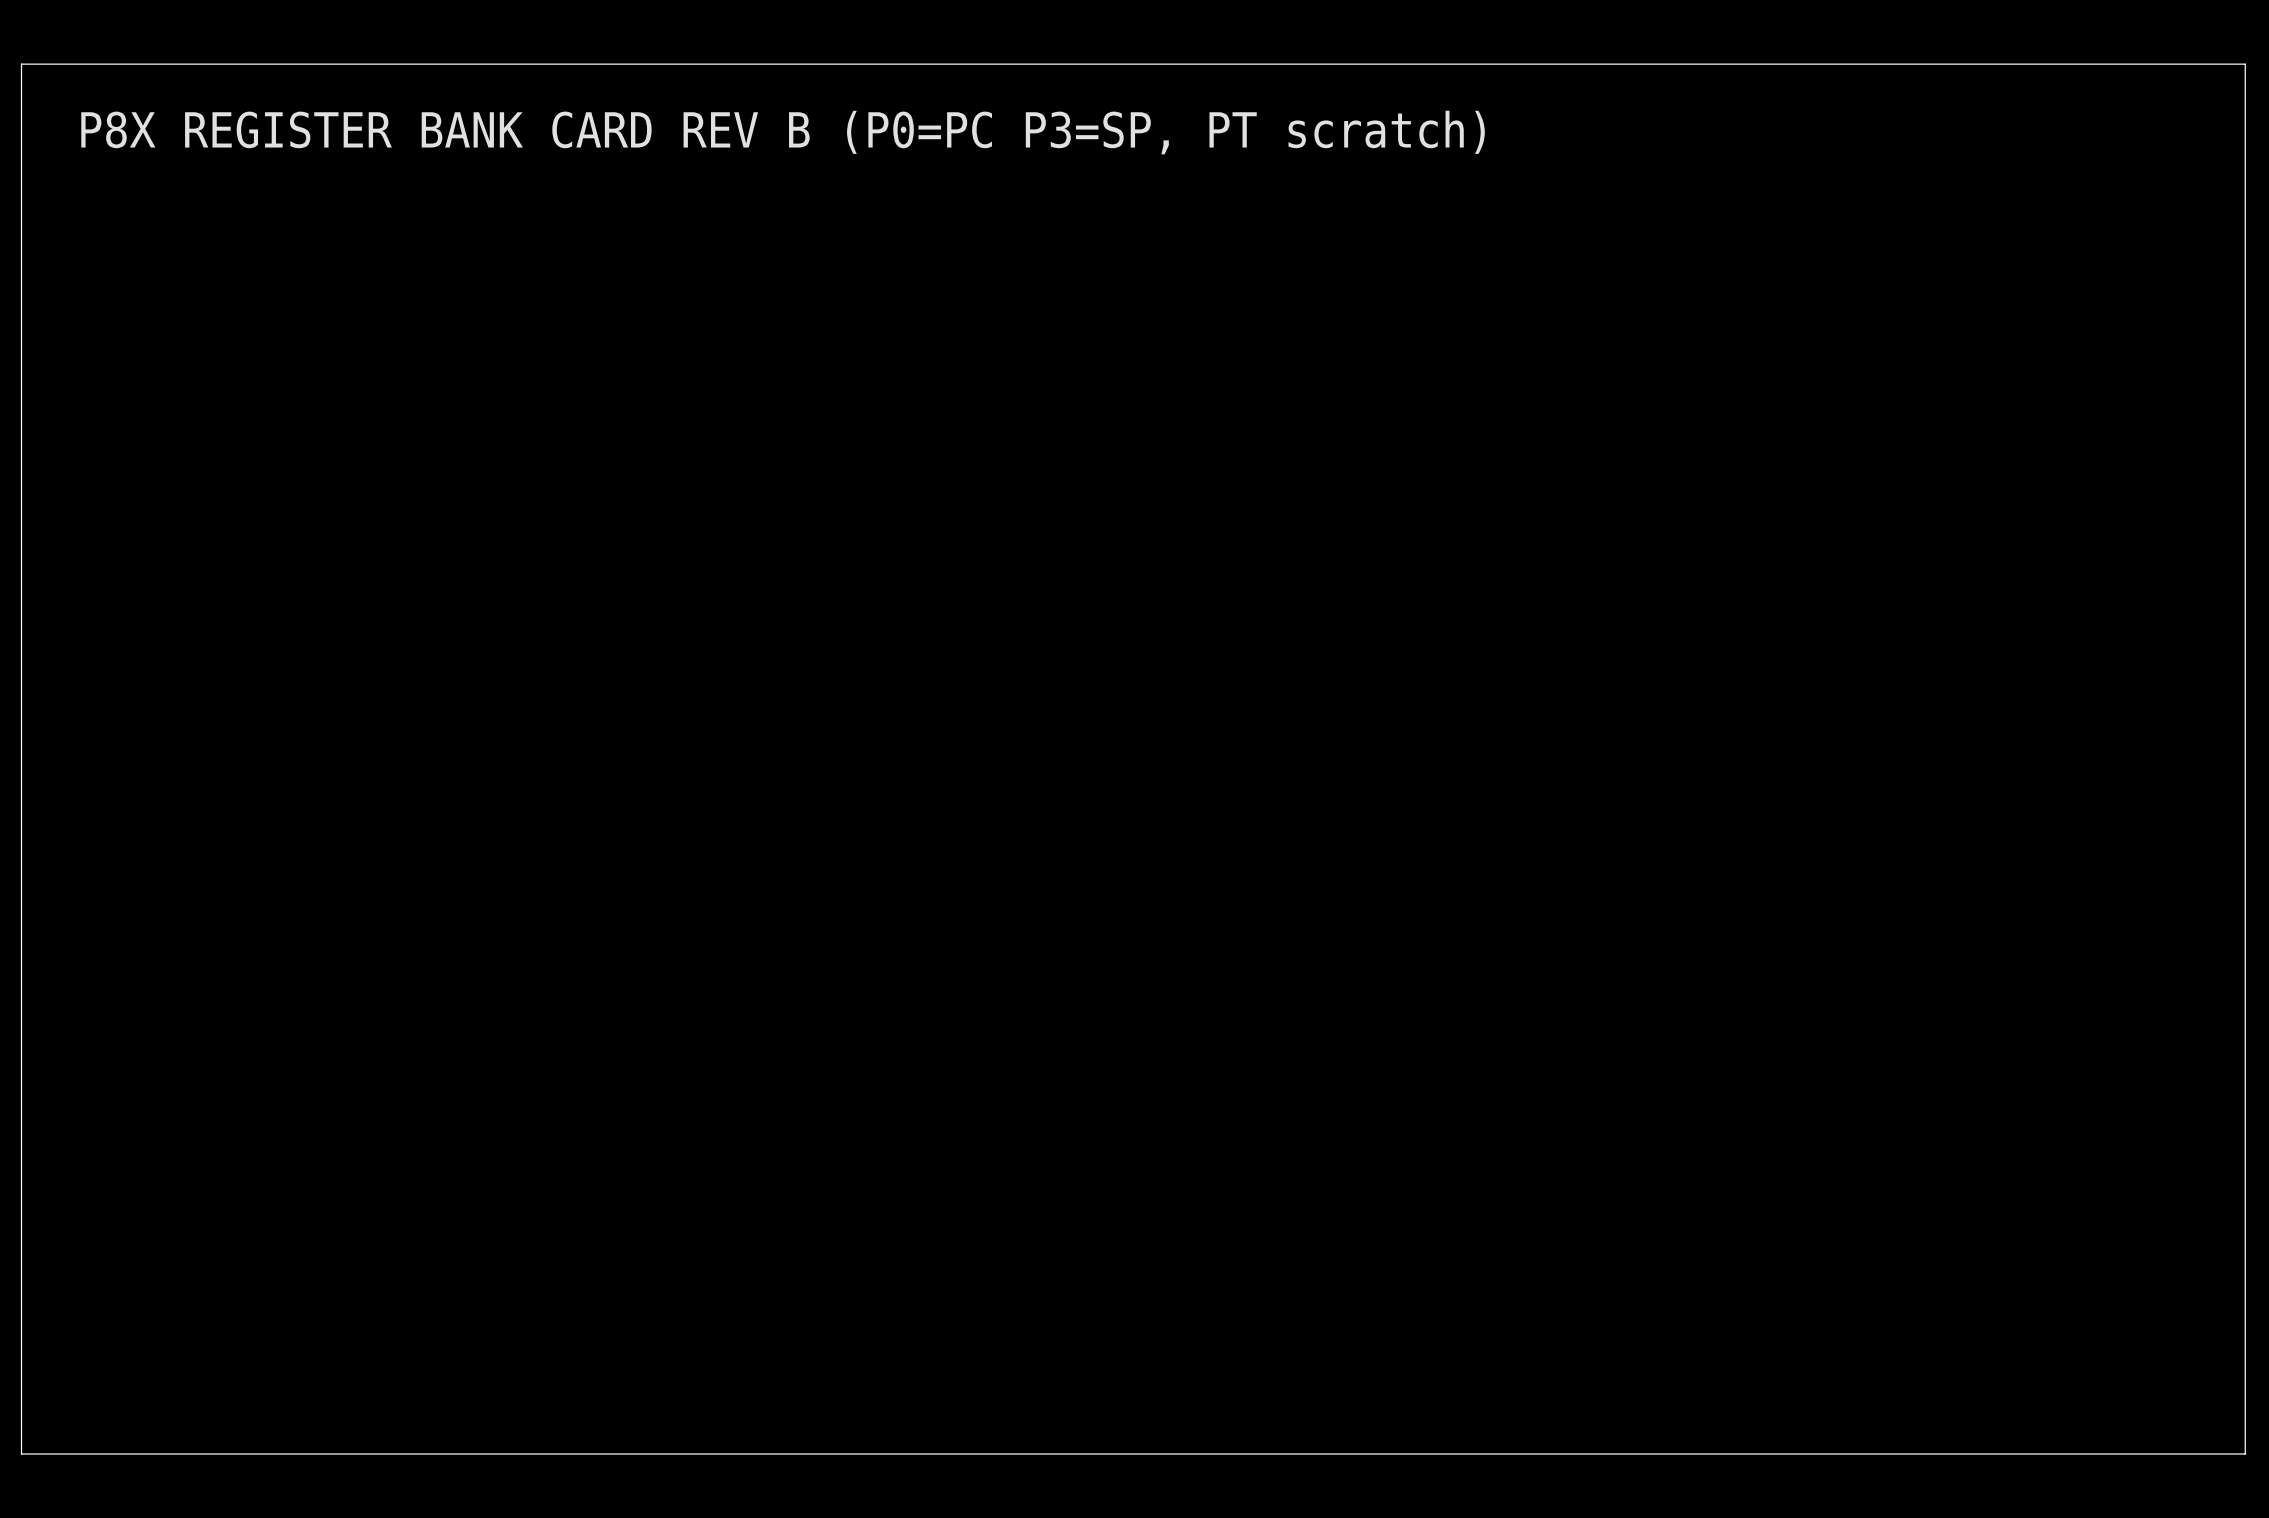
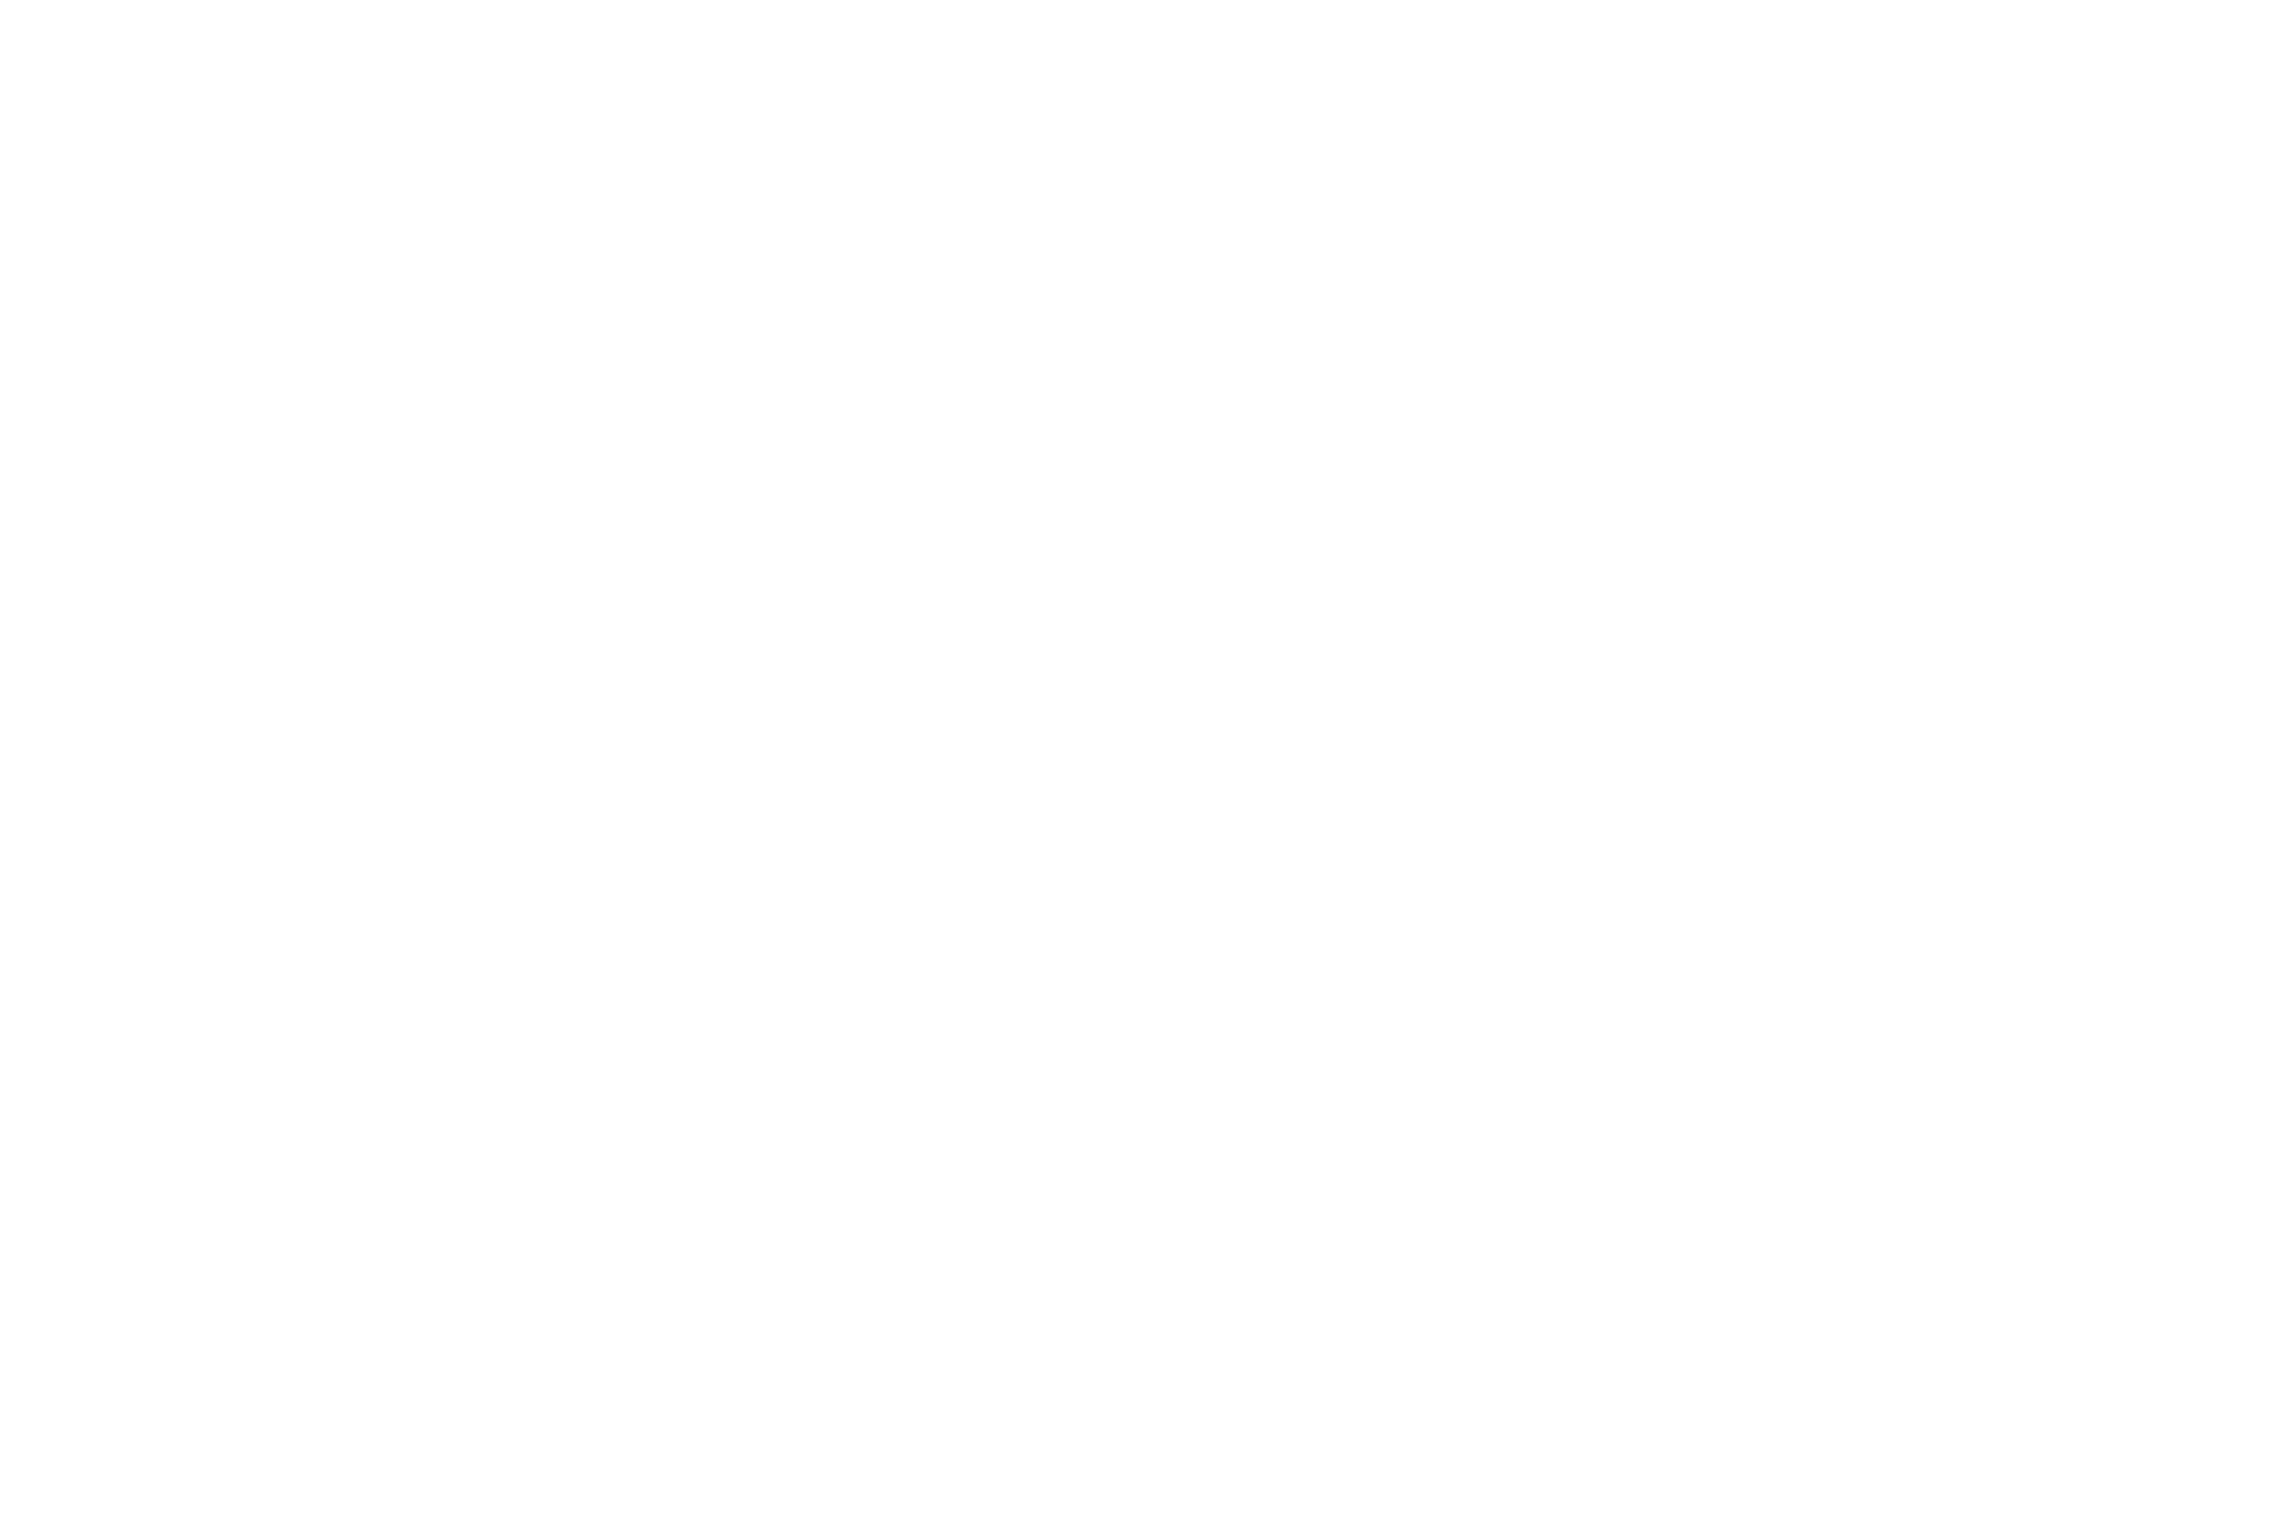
board edge: (21, 64) (2245, 64) (2245, 1453) (21, 1453) (21, 64) -> none
text: P8X REGISTER BANK CARD REV B (P0=PC P3=SP, PT scratch) (783, 132) -> none

